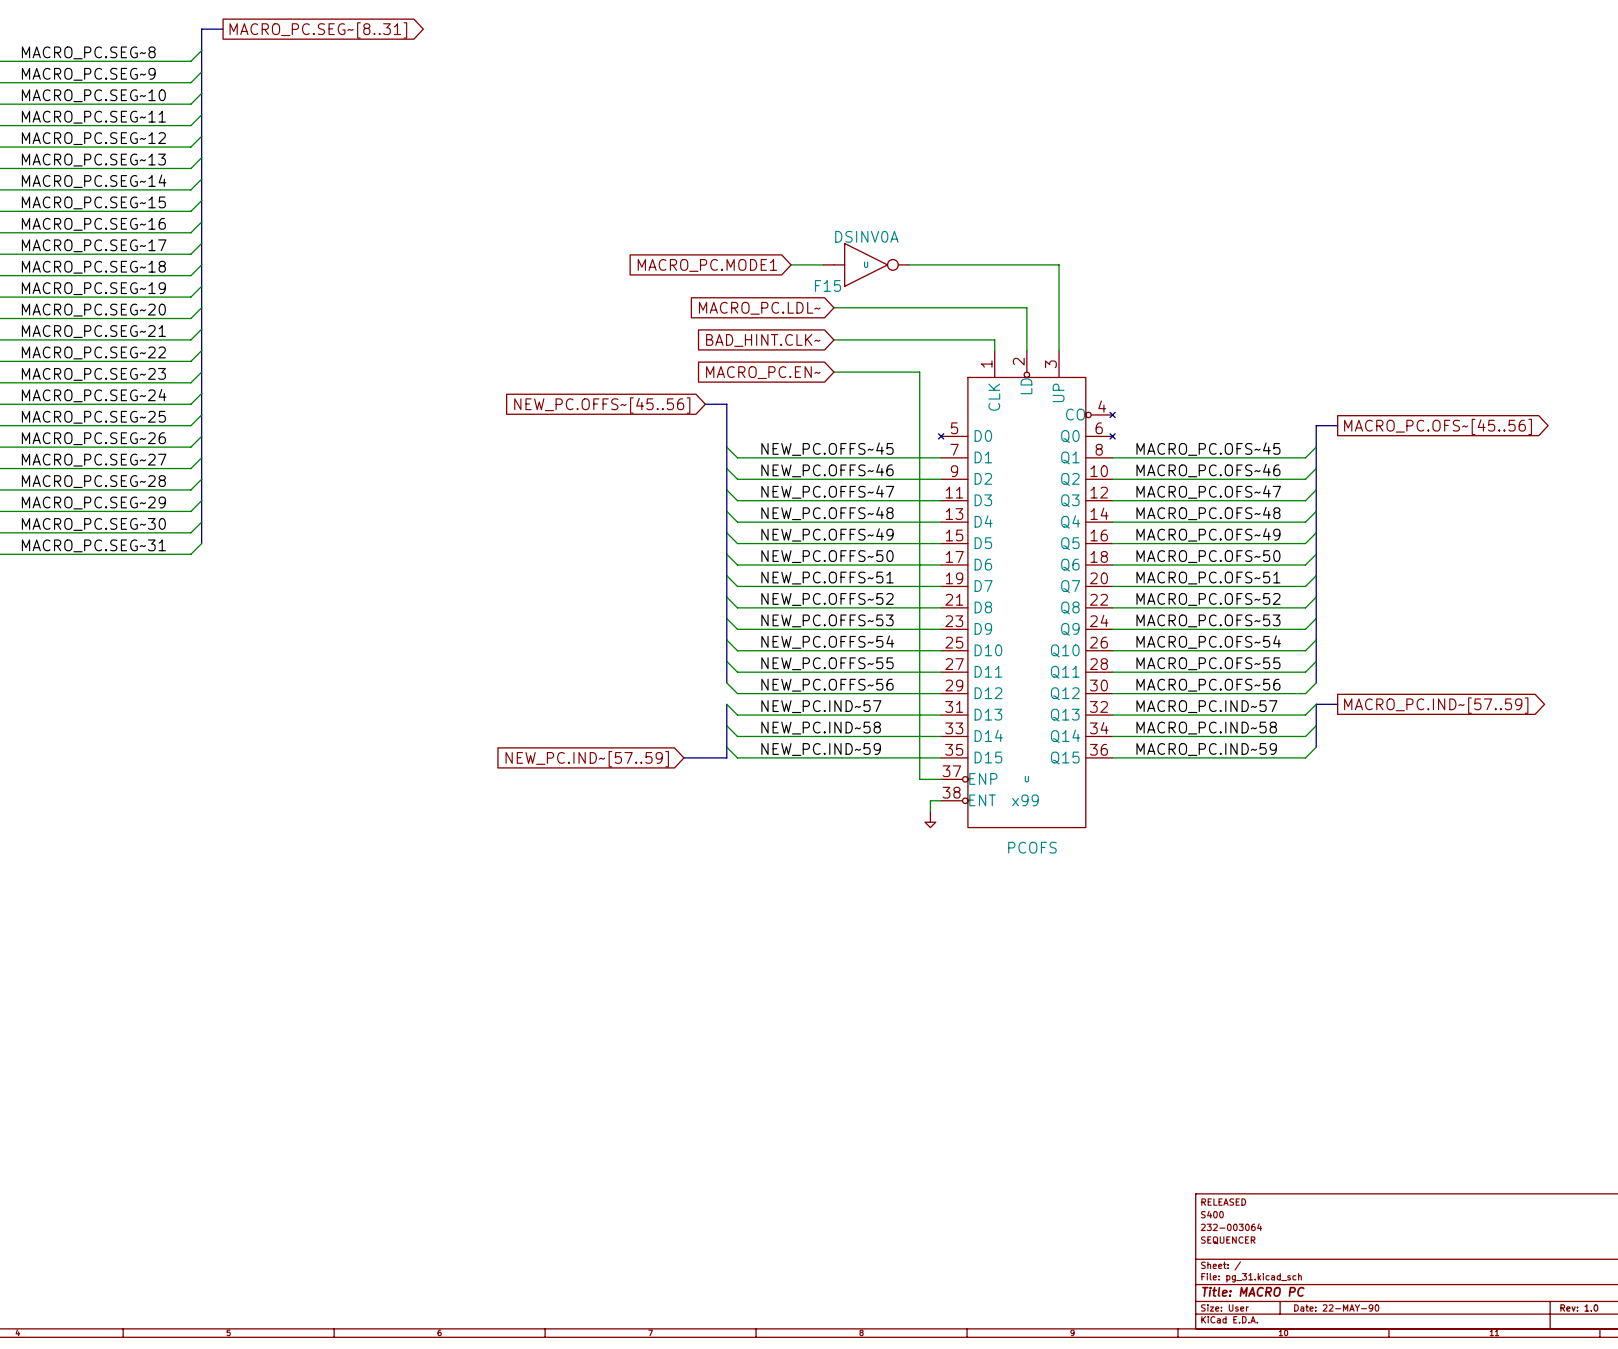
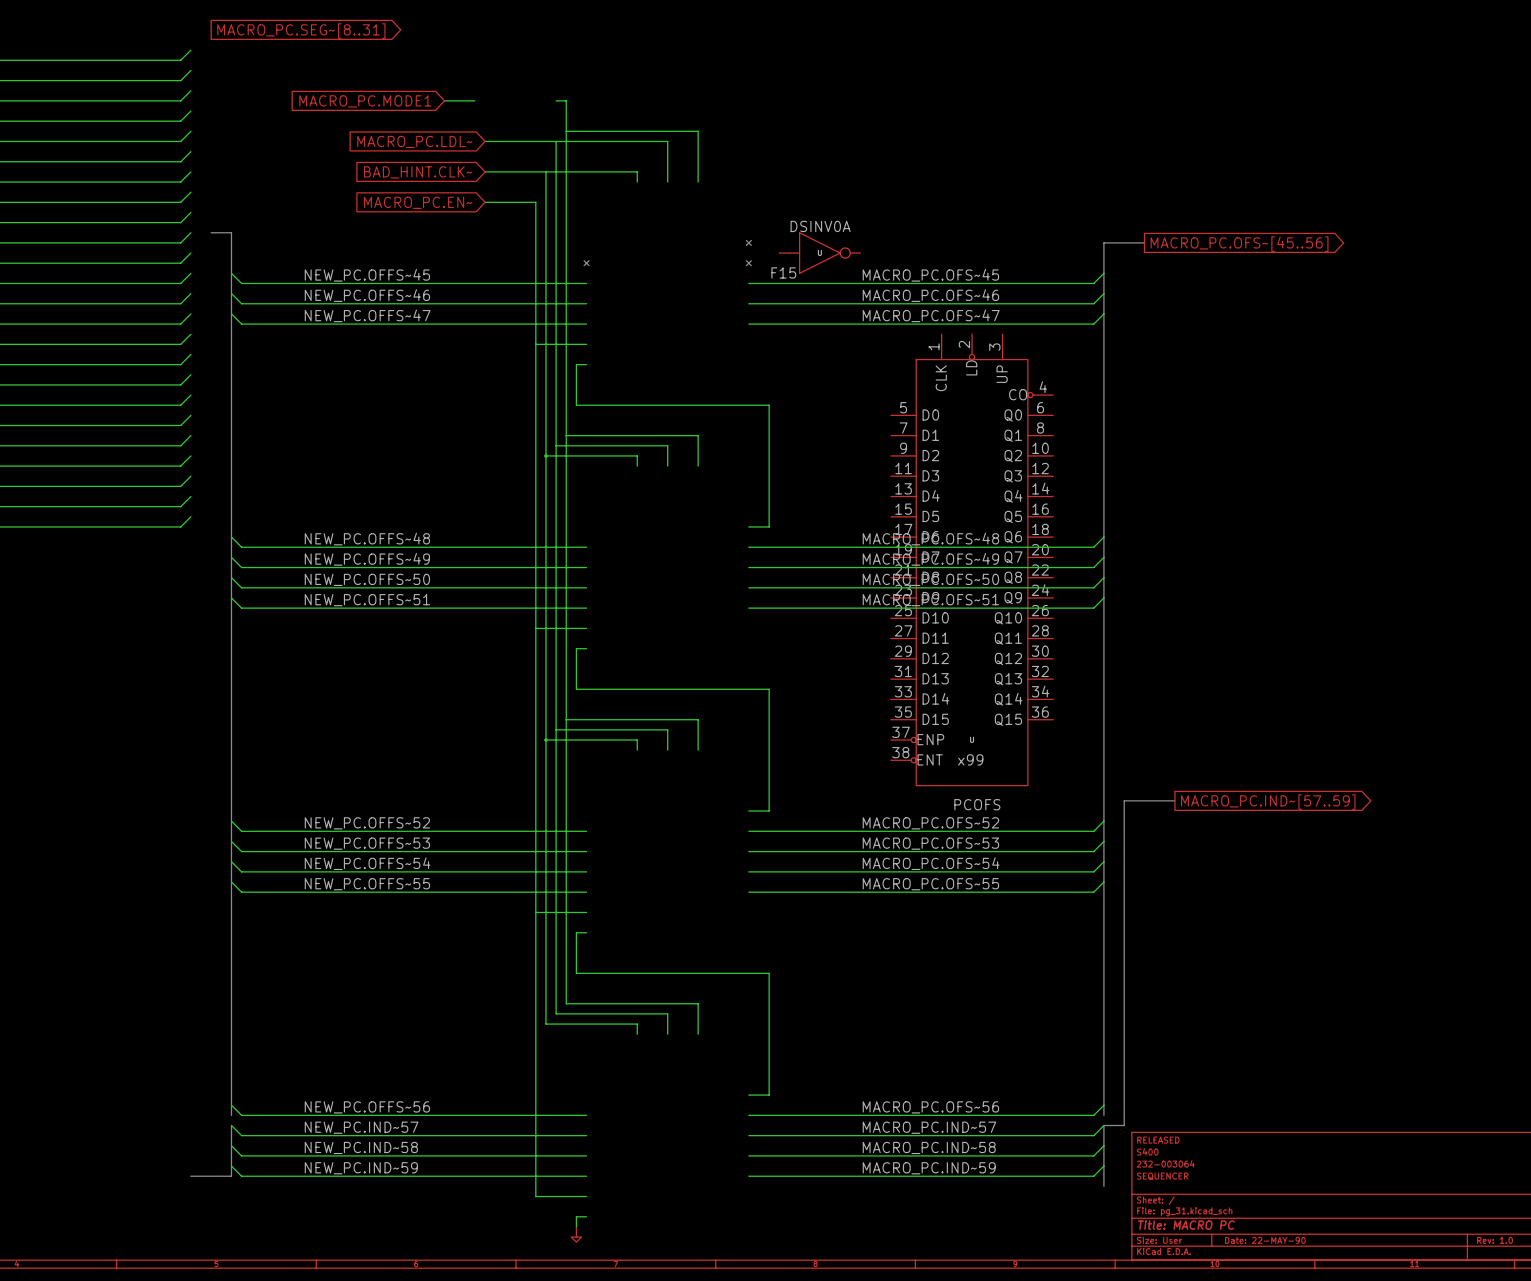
bus: (223, 29) (201, 29) (201, 543) -> none
label: MACRO_PC.SEG~8 (88, 52) -> none
label: MACRO_PC.SEG~9 (88, 74) -> none
label: MACRO_PC.SEG~10 (93, 95) -> none
global label: none -> MACRO_PC.MODE1 (365, 101)
wire: none -> (444, 100) (474, 100)
wire: none -> (556, 100) (566, 100) (566, 1003) (698, 1003) (698, 1034)
label: MACRO_PC.SEG~11 (93, 117) -> none
wire: none -> (566, 131) (698, 131) (698, 182)
label: MACRO_PC.SEG~12 (93, 138) -> none
global label: none -> MACRO_PC.LDL~ (414, 141)
wire: none -> (485, 141) (667, 141) (667, 182)
wire: none -> (556, 141) (556, 1013) (667, 1013) (667, 1034)
label: MACRO_PC.SEG~13 (93, 160) -> none
global label: none -> BAD_HINT.CLK~ (418, 172)
wire: none -> (485, 171) (637, 171) (637, 182)
wire: none -> (545, 171) (545, 1024) (637, 1024) (637, 1034)
label: MACRO_PC.SEG~14 (94, 181) -> none
label: MACRO_PC.SEG~15 (93, 202) -> none
global label: none -> MACRO_PC.EN~ (418, 202)
wire: none -> (485, 202) (535, 202) (535, 1196) (586, 1196)
label: MACRO_PC.SEG~16 (93, 224) -> none
bus: none -> (211, 232) (231, 232) (231, 1115)
label: MACRO_PC.SEG~17 (94, 245) -> none
no-connect mark: none -> (748, 242)
bus: none -> (1144, 242) (1103, 242) (1103, 1115)
global label: none -> MACRO_PC.OFS~[45..56] (1239, 244)
wire: (791, 264) (823, 264) -> none
wire: (908, 264) (1059, 264) (1059, 350) -> none
global label: MACRO_PC.MODE1 (707, 265) -> none
label: MACRO_PC.SEG~18 (93, 267) -> none
no-connect mark: none -> (586, 263)
no-connect mark: none -> (748, 263)
wire: none -> (231, 273) (241, 283) (586, 283)
wire: none -> (1103, 273) (1093, 283) (748, 283)
label: MACRO_PC.SEG~19 (93, 288) -> none
label: none -> NEW_PC.OFFS~45 (367, 275)
label: none -> MACRO_PC.OFS~45 (930, 275)
wire: none -> (231, 293) (241, 303) (586, 303)
wire: (833, 307) (1026, 307) (1026, 350) -> none
wire: none -> (1103, 293) (1093, 303) (748, 303)
global label: MACRO_PC.LDL~ (759, 308) -> none
label: none -> NEW_PC.OFFS~46 (367, 295)
label: none -> MACRO_PC.OFS~46 (930, 295)
label: MACRO_PC.SEG~20 (93, 310) -> none
wire: none -> (231, 313) (241, 324) (586, 324)
label: MACRO_PC.SEG~21 (93, 331) -> none
label: none -> NEW_PC.OFFS~47 (367, 315)
label: none -> MACRO_PC.OFS~47 (931, 315)
wire: none -> (748, 324) (789, 324)
wire: (994, 339) (994, 350) -> (941, 324) (1093, 324) (1103, 313)
global label: BAD_HINT.CLK~ (763, 340) -> none
label: MACRO_PC.SEG~22 (93, 352) -> none
wire: none -> (535, 344) (586, 344)
global label: MACRO_PC.EN~ (763, 372) -> none
wire: (833, 372) (919, 372) (919, 779) (941, 779) -> none
label: MACRO_PC.SEG~23 (93, 374) -> none
wire: none -> (586, 364) (576, 364) (576, 405) (769, 405) (769, 526) (748, 526)
label: MACRO_PC.SEG~24 (94, 395) -> none
bus: (705, 404) (726, 404) (726, 682) -> none
global label: NEW_PC.OFFS~[45..56] (602, 405) -> none
no-connect mark: (1112, 414) -> none
label: MACRO_PC.SEG~25 (93, 417) -> none
bus: (1337, 425) (1316, 425) (1316, 682) -> none
global label: MACRO_PC.OFS~[45..56] (1438, 426) -> none
no-connect mark: (941, 436) -> none
no-connect mark: (1112, 436) -> none
label: MACRO_PC.SEG~26 (93, 438) -> none
wire: (726, 447) (737, 457) (941, 457) -> none
wire: (1316, 447) (1305, 457) (1112, 457) -> none
label: NEW_PC.OFFS~45 (827, 449) -> none
label: MACRO_PC.OFS~45 (1208, 449) -> none
wire: none -> (566, 435) (698, 435) (698, 466)
label: MACRO_PC.SEG~27 (94, 460) -> none
wire: none -> (556, 445) (667, 445) (667, 466)
wire: (726, 468) (737, 479) (941, 479) -> none
wire: (1316, 468) (1305, 479) (1112, 479) -> none
label: NEW_PC.OFFS~46 (827, 470) -> none
label: MACRO_PC.OFS~46 (1208, 470) -> none
wire: none -> (545, 455) (637, 455) (637, 466)
junction: none -> (545, 455)
label: MACRO_PC.SEG~28 (93, 481) -> none
wire: (726, 489) (737, 500) (941, 500) -> none
wire: (1316, 489) (1305, 500) (1112, 500) -> none
label: NEW_PC.OFFS~47 (827, 492) -> none
label: MACRO_PC.OFS~47 (1208, 492) -> none
label: MACRO_PC.SEG~29 (93, 503) -> none
wire: (726, 511) (737, 522) (941, 522) -> none
wire: (1316, 511) (1305, 522) (1112, 522) -> none
label: NEW_PC.OFFS~48 (827, 513) -> none
label: MACRO_PC.OFS~48 (1208, 513) -> none
label: MACRO_PC.SEG~30 (93, 524) -> none
wire: (726, 532) (737, 543) (941, 543) -> none
wire: (1316, 532) (1305, 543) (1112, 543) -> none
label: NEW_PC.OFFS~49 (827, 534) -> none
label: MACRO_PC.OFS~49 (1208, 534) -> none
label: MACRO_PC.SEG~31 (93, 545) -> none
wire: (726, 554) (737, 565) (941, 565) -> none
wire: (1316, 554) (1305, 565) (1112, 565) -> none
label: NEW_PC.OFFS~50 (827, 556) -> none
label: MACRO_PC.OFS~50 (1208, 556) -> none
wire: none -> (231, 537) (241, 547) (586, 547)
wire: none -> (1103, 537) (1093, 547) (748, 547)
label: none -> NEW_PC.OFFS~48 (367, 539)
label: none -> MACRO_PC.OFS~48 (930, 539)
wire: (726, 575) (737, 586) (941, 586) -> none
wire: (1316, 575) (1305, 586) (1112, 586) -> none
label: NEW_PC.OFFS~51 (827, 578) -> none
label: MACRO_PC.OFS~51 (1208, 578) -> none
wire: none -> (231, 557) (241, 567) (586, 567)
wire: none -> (1103, 557) (1093, 567) (748, 567)
label: none -> NEW_PC.OFFS~49 (367, 559)
label: none -> MACRO_PC.OFS~49 (930, 559)
wire: (726, 597) (737, 607) (941, 607) -> none
wire: (1316, 597) (1305, 607) (1112, 607) -> none
label: NEW_PC.OFFS~52 (827, 599) -> none
label: MACRO_PC.OFS~52 (1208, 599) -> none
wire: none -> (231, 577) (241, 587) (586, 587)
wire: none -> (1103, 577) (1093, 587) (748, 587)
label: none -> NEW_PC.OFFS~50 (367, 579)
label: none -> MACRO_PC.OFS~50 (930, 579)
wire: (726, 618) (737, 629) (941, 629) -> none
wire: (1316, 618) (1305, 629) (1112, 629) -> none
label: NEW_PC.OFFS~53 (827, 620) -> none
label: MACRO_PC.OFS~53 (1208, 620) -> none
wire: none -> (231, 597) (241, 608) (586, 608)
wire: none -> (1103, 597) (1093, 608) (748, 608)
label: none -> NEW_PC.OFFS~51 (367, 600)
label: none -> MACRO_PC.OFS~51 (930, 600)
wire: (726, 640) (737, 650) (941, 650) -> none
wire: (1316, 640) (1305, 650) (1112, 650) -> none
label: NEW_PC.OFFS~54 (827, 642) -> none
label: MACRO_PC.OFS~54 (1208, 642) -> none
wire: none -> (535, 628) (586, 628)
wire: (726, 661) (737, 672) (941, 672) -> none
wire: (1316, 661) (1305, 672) (1112, 672) -> none
label: NEW_PC.OFFS~55 (827, 663) -> none
label: MACRO_PC.OFS~55 (1208, 663) -> none
wire: none -> (586, 648) (576, 648) (576, 689) (769, 689) (769, 811) (748, 811)
wire: (726, 682) (737, 693) (941, 693) -> none
wire: (1316, 682) (1305, 693) (1112, 693) -> none
label: NEW_PC.OFFS~56 (827, 685) -> none
label: MACRO_PC.OFS~56 (1208, 685) -> none
wire: (726, 704) (737, 715) (941, 715) -> none
bus: (726, 704) (726, 757) (683, 757) -> none
wire: (1316, 704) (1305, 715) (1112, 715) -> none
bus: (1337, 704) (1316, 704) (1316, 747) -> none
global label: MACRO_PC.IND~[57..59] (1436, 705) -> none
label: NEW_PC.IND~57 (821, 706) -> none
label: MACRO_PC.IND~57 (1206, 706) -> none
wire: (726, 725) (737, 736) (941, 736) -> none
wire: (1316, 725) (1305, 736) (1112, 736) -> none
label: NEW_PC.IND~58 (821, 728) -> none
label: MACRO_PC.IND~58 (1206, 728) -> none
wire: (726, 747) (737, 757) (941, 757) -> none
wire: (1316, 747) (1305, 757) (1112, 757) -> none
label: NEW_PC.IND~59 (821, 749) -> none
label: MACRO_PC.IND~59 (1206, 749) -> none
wire: none -> (566, 719) (698, 719) (698, 750)
global label: NEW_PC.IND~[57..59] (587, 759) -> none
wire: none -> (556, 729) (667, 729) (667, 750)
wire: none -> (545, 740) (637, 740) (637, 750)
junction: none -> (545, 740)
wire: (941, 800) (930, 800) (930, 811) -> none
power symbol: (930, 819) -> none
bus: none -> (1174, 800) (1124, 800) (1124, 1125) (1103, 1125) (1103, 1186)
global label: none -> MACRO_PC.IND~[57..59] (1268, 802)
wire: none -> (231, 821) (241, 831) (586, 831)
wire: none -> (1103, 821) (1093, 831) (748, 831)
label: none -> NEW_PC.OFFS~52 (367, 823)
label: none -> MACRO_PC.OFS~52 (930, 823)
wire: none -> (231, 841) (241, 851) (586, 851)
wire: none -> (1103, 841) (1093, 851) (748, 851)
label: none -> NEW_PC.OFFS~53 (367, 843)
label: none -> MACRO_PC.OFS~53 (930, 843)
wire: none -> (231, 861) (241, 871) (586, 871)
wire: none -> (1103, 861) (1093, 871) (748, 871)
label: none -> NEW_PC.OFFS~54 (367, 863)
label: none -> MACRO_PC.OFS~54 (931, 863)
wire: none -> (231, 882) (241, 892) (586, 892)
wire: none -> (1103, 882) (1093, 892) (748, 892)
label: none -> NEW_PC.OFFS~55 (367, 884)
label: none -> MACRO_PC.OFS~55 (930, 884)
wire: none -> (535, 912) (586, 912)
wire: none -> (586, 932) (576, 932) (576, 973) (769, 973) (769, 1095) (748, 1095)
wire: none -> (231, 1105) (241, 1115) (586, 1115)
wire: none -> (1103, 1105) (1093, 1115) (748, 1115)
label: none -> NEW_PC.OFFS~56 (367, 1107)
label: none -> MACRO_PC.OFS~56 (930, 1107)
wire: none -> (231, 1125) (241, 1135) (586, 1135)
bus: none -> (231, 1125) (231, 1176) (190, 1176)
wire: none -> (1103, 1125) (1093, 1135) (748, 1135)
label: none -> NEW_PC.IND~57 (361, 1127)
label: none -> MACRO_PC.IND~57 (929, 1127)
wire: none -> (231, 1145) (241, 1155) (586, 1155)
wire: none -> (1103, 1145) (1093, 1155) (748, 1155)
label: none -> NEW_PC.IND~58 (361, 1147)
label: none -> MACRO_PC.IND~58 (929, 1147)
wire: none -> (231, 1166) (241, 1176) (586, 1176)
wire: none -> (1103, 1166) (1093, 1176) (748, 1176)
label: none -> NEW_PC.IND~59 (361, 1168)
label: none -> MACRO_PC.IND~59 (929, 1168)
wire: none -> (586, 1216) (576, 1216) (576, 1226)
power symbol: none -> (576, 1234)

